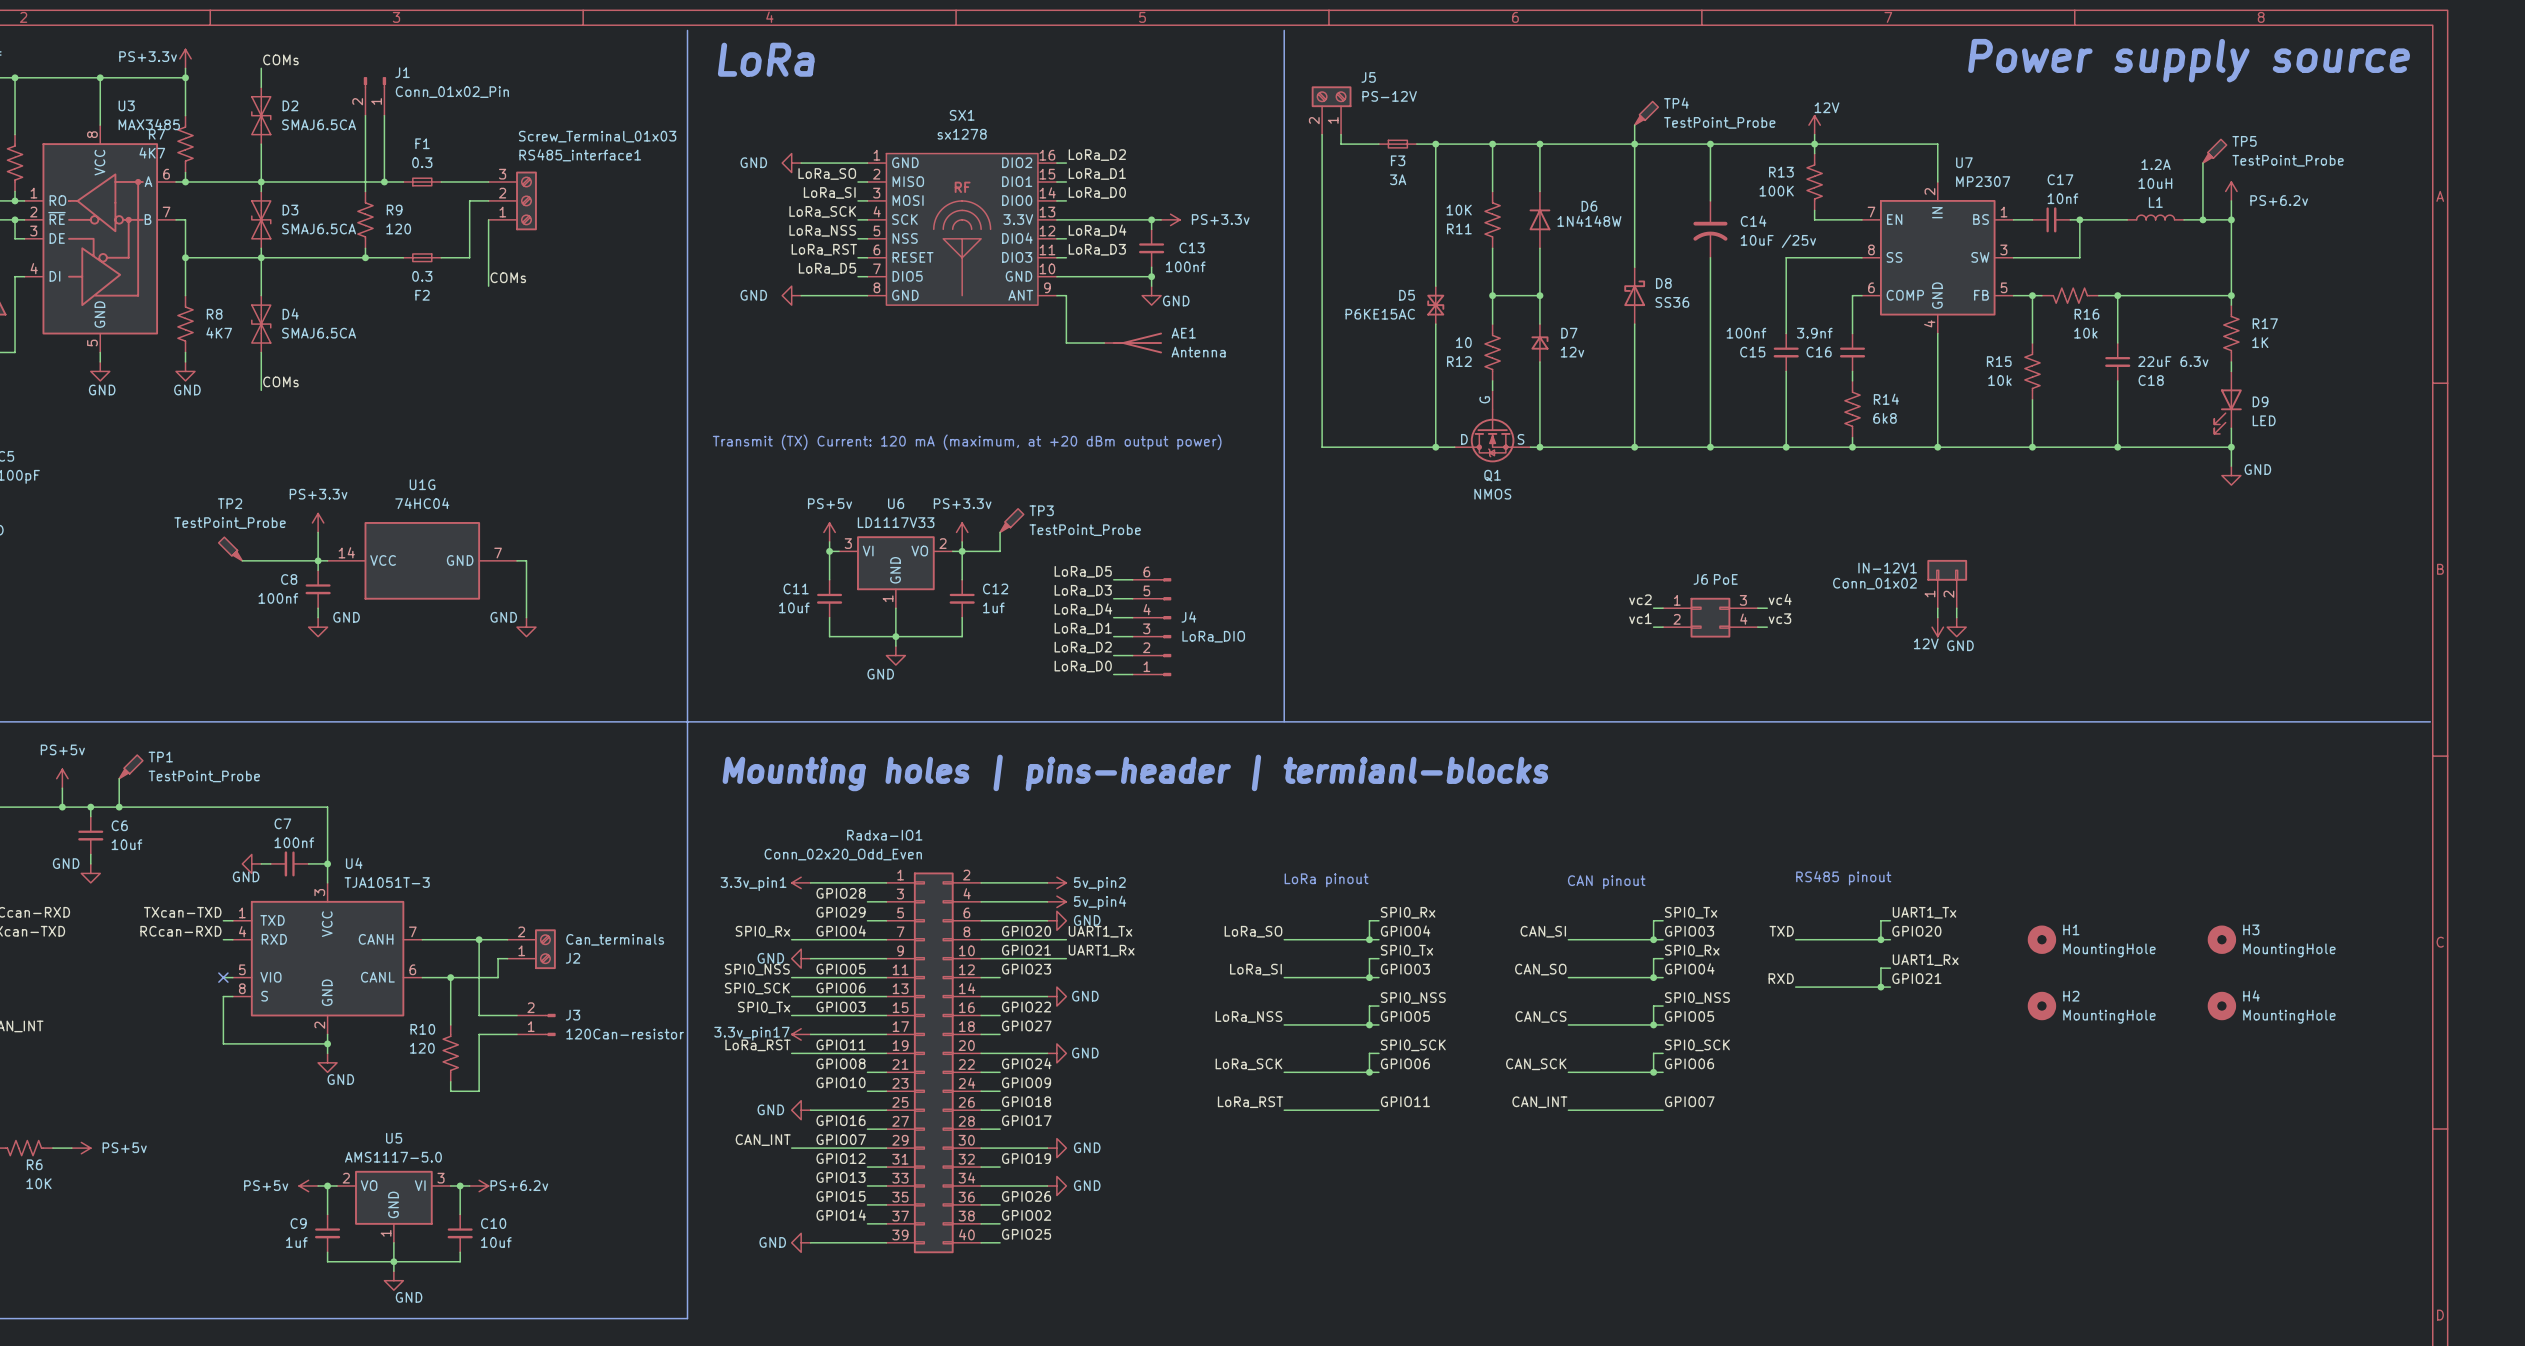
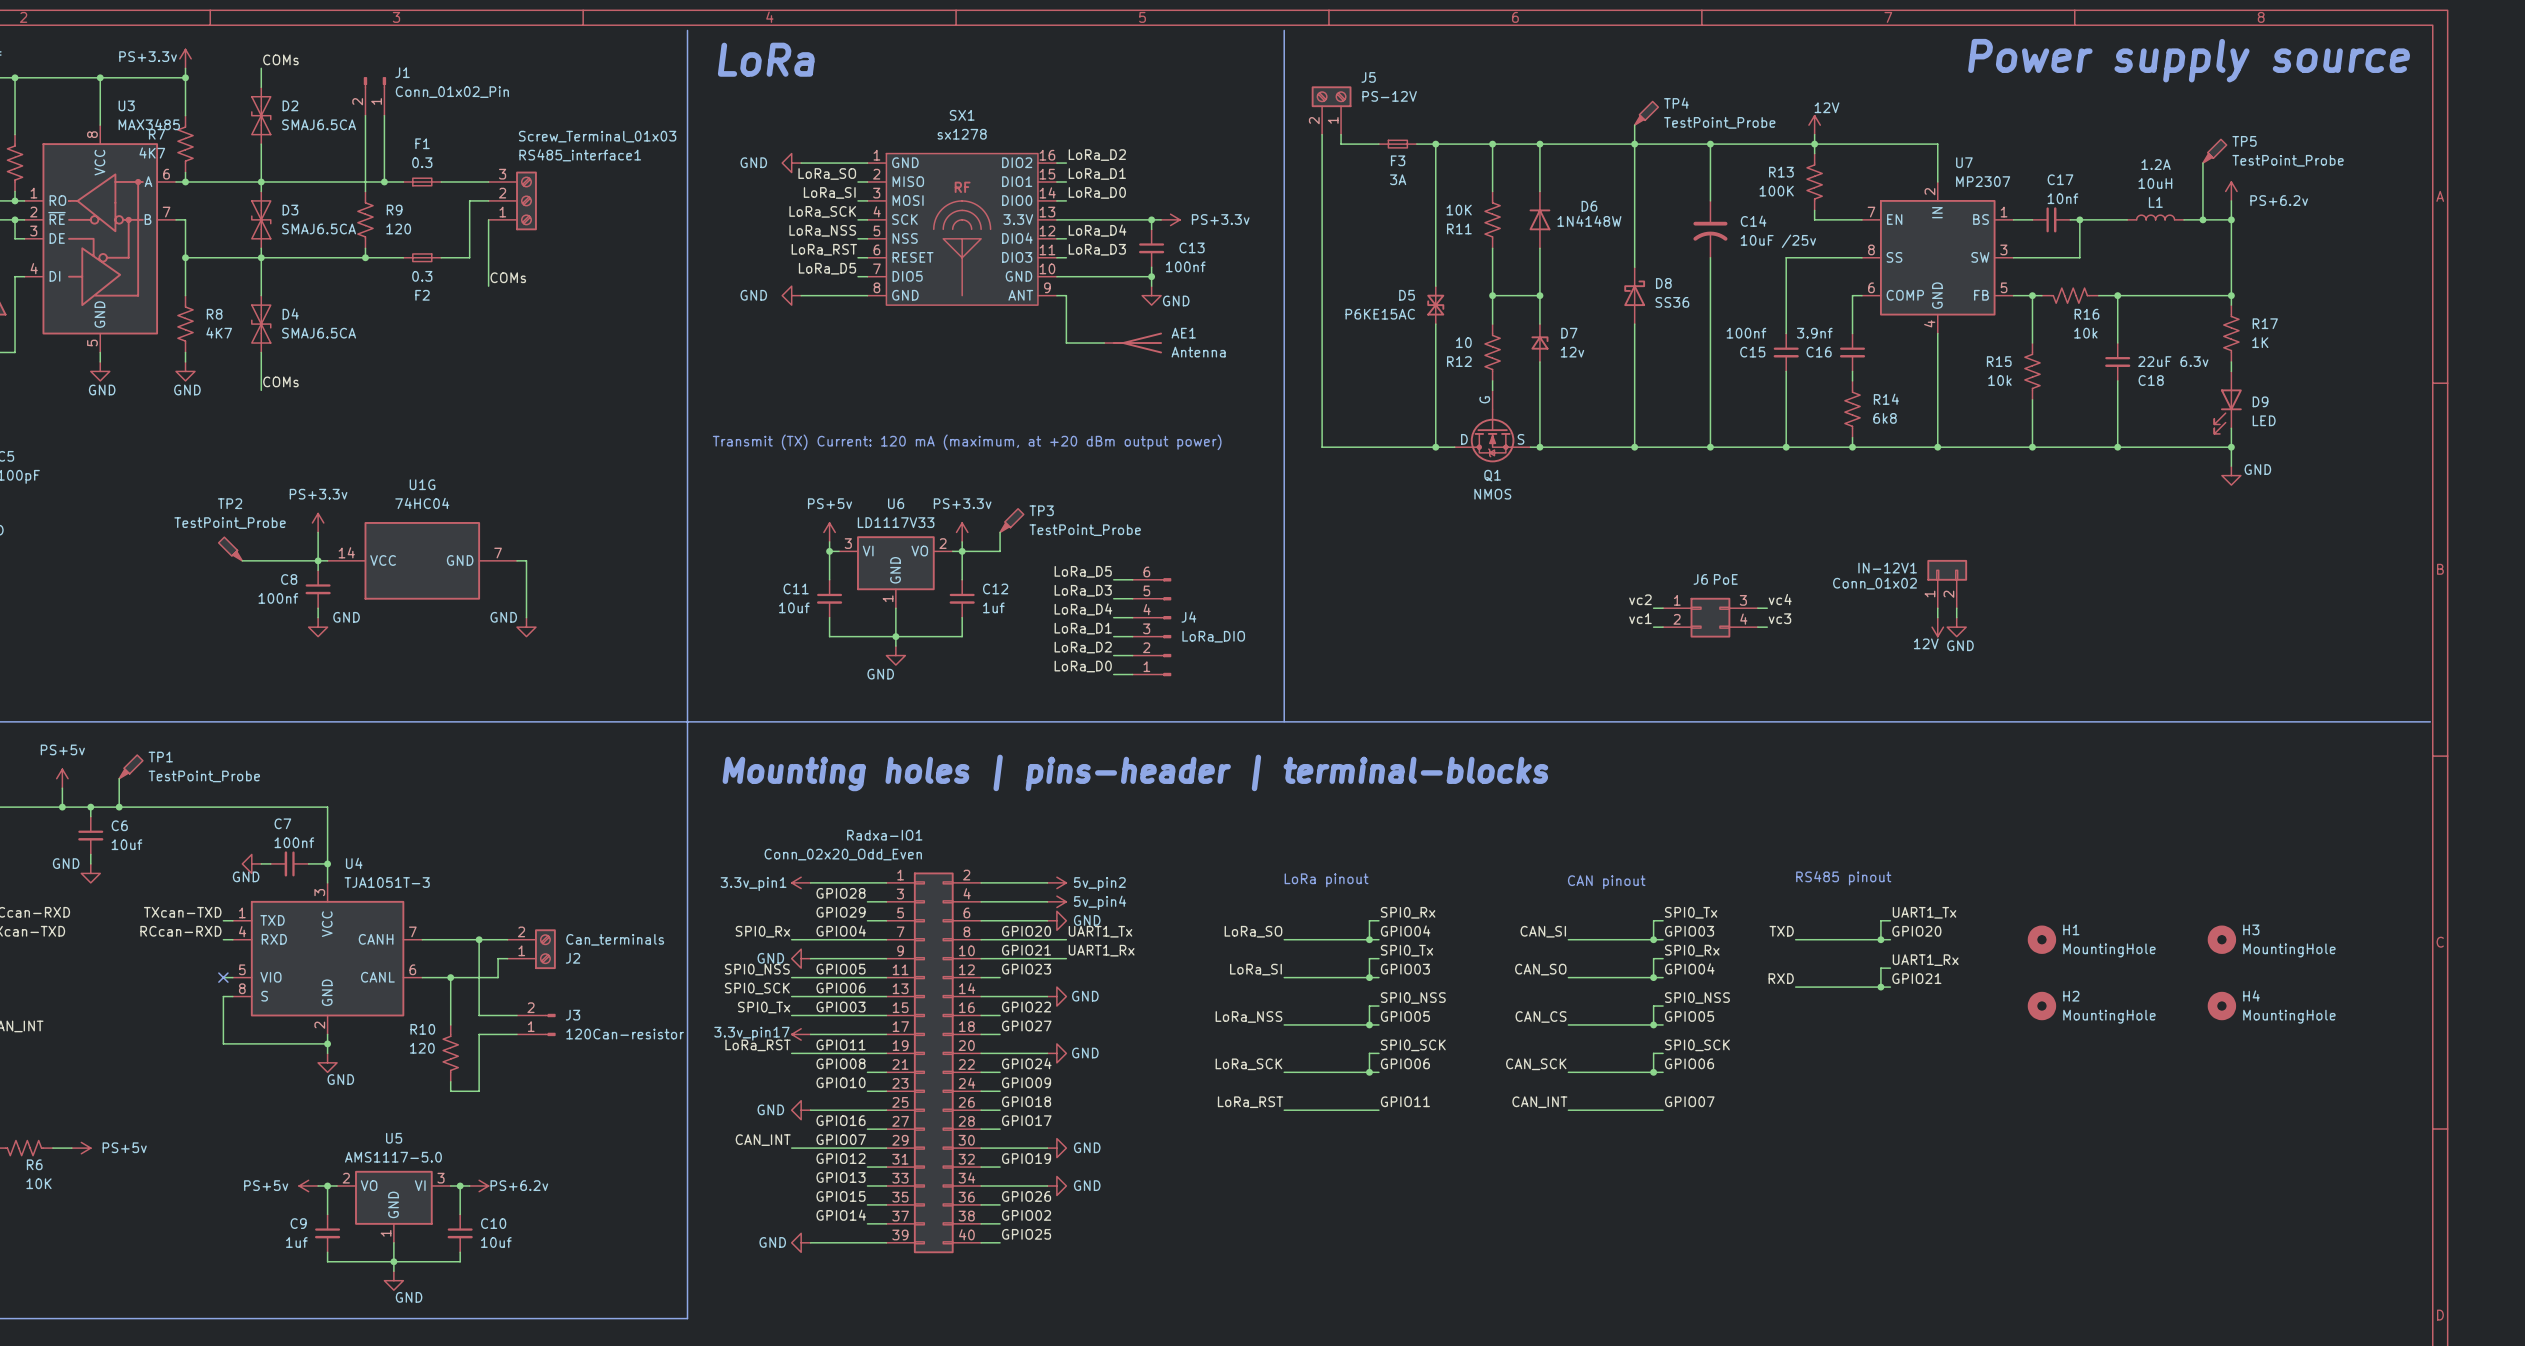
text: Mounting holes | pins-header | termianl-blocks (1135, 772) -> Mounting holes | pins-header | terminal-blocks (1135, 772)

